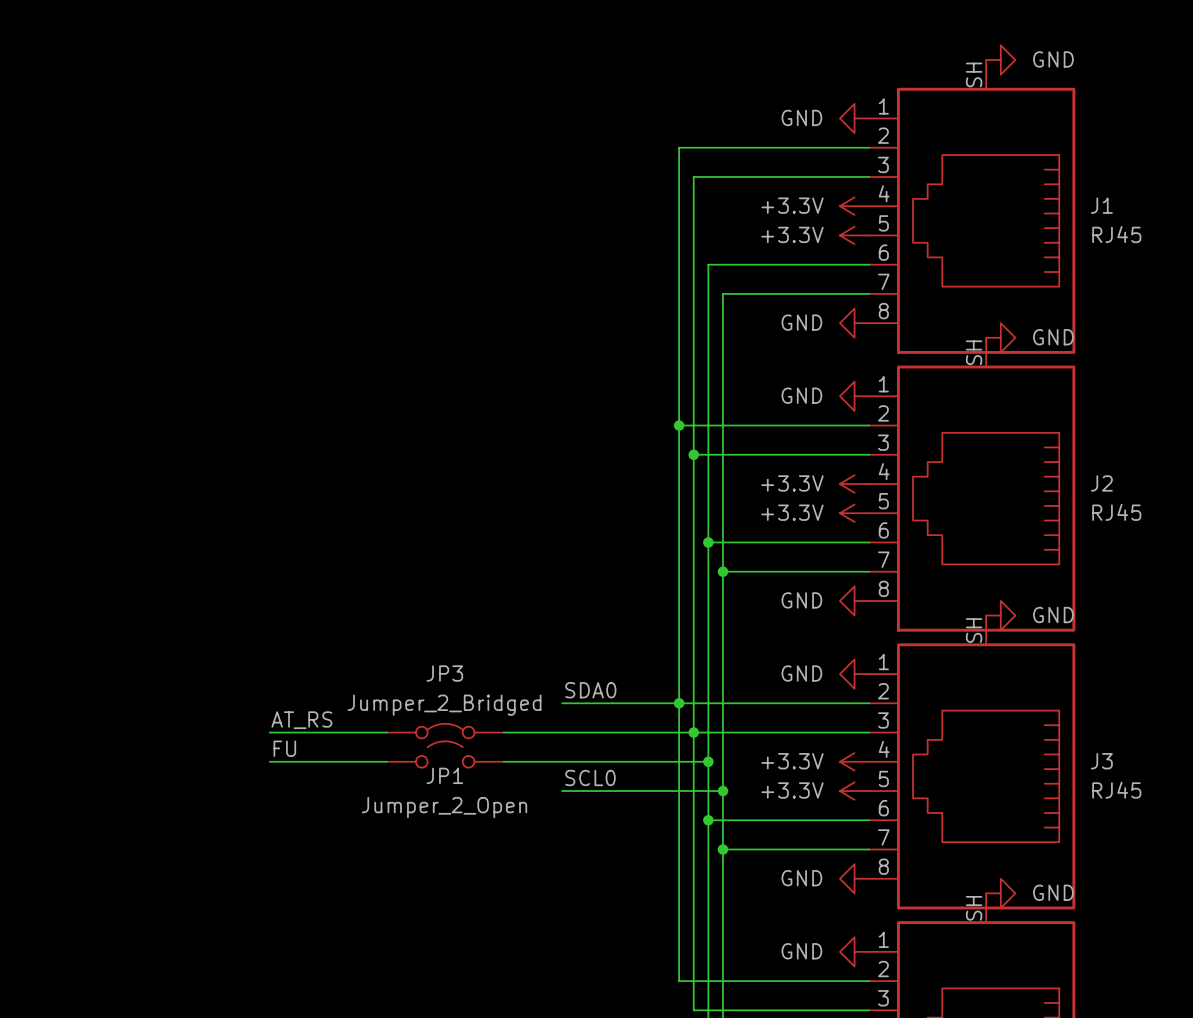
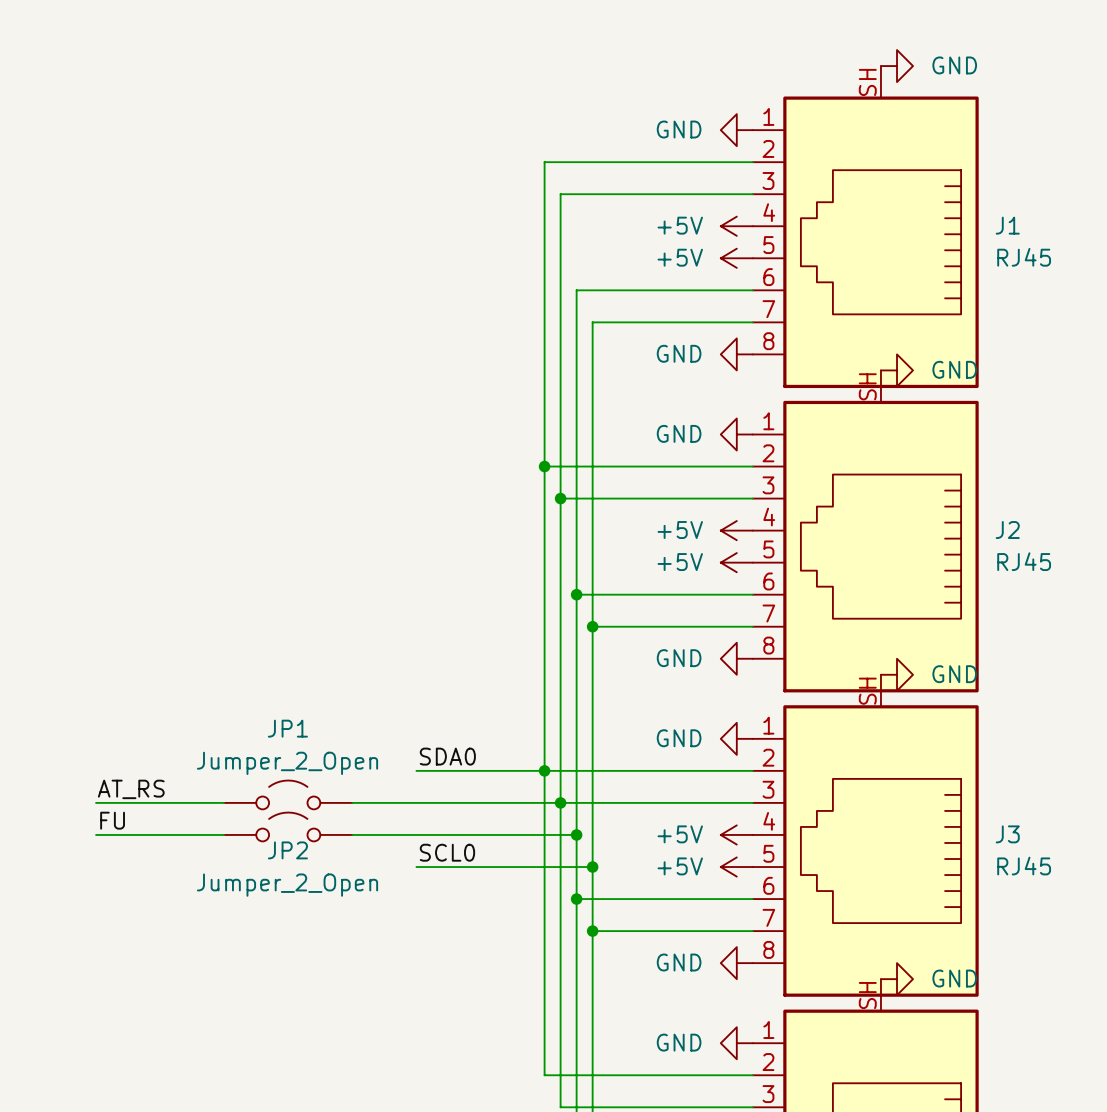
power symbol: +3.3V (854, 206) -> +5V (736, 226)
power symbol: +3.3V (854, 235) -> +5V (736, 258)
power symbol: +3.3V (854, 483) -> +5V (736, 530)
power symbol: +3.3V (854, 513) -> +5V (736, 562)
JP1: none -> Jumper_2_Open (288, 794)
JP3: Jumper_2_Bridged (445, 731) -> none
power symbol: +3.3V (854, 761) -> +5V (736, 834)
JP1 name: JP1 (444, 775) -> JP2 (287, 850)
power symbol: +3.3V (854, 791) -> +5V (736, 867)

